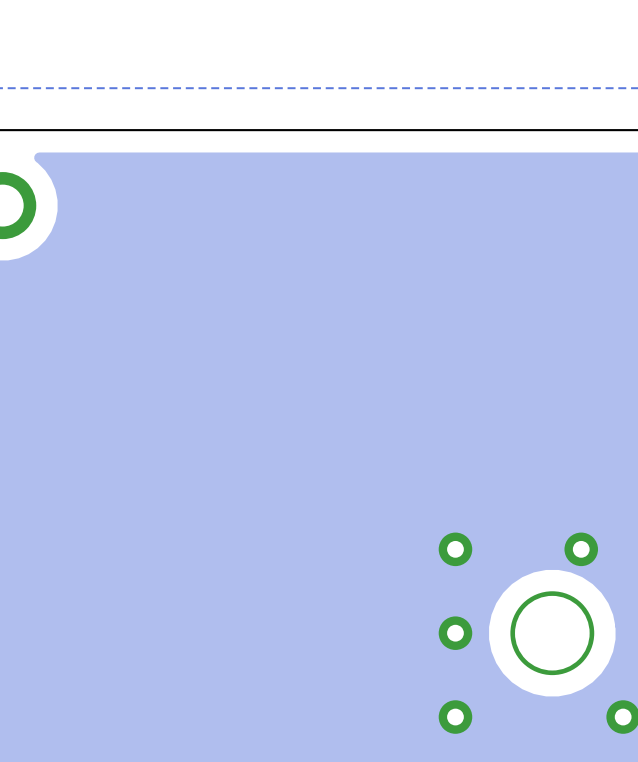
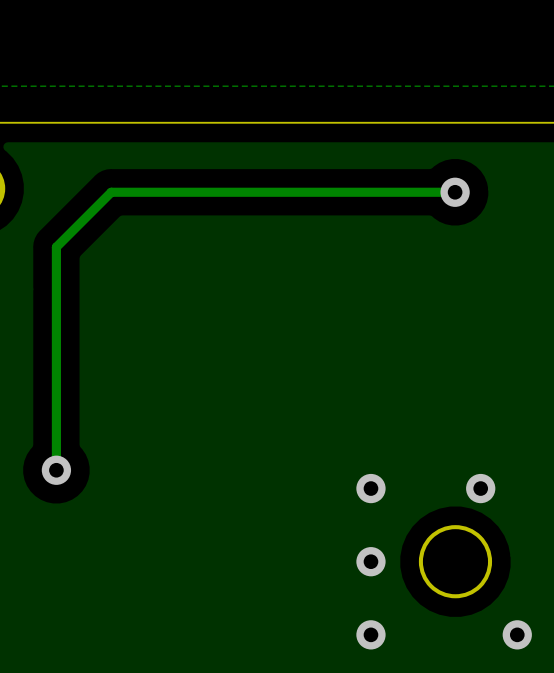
track: none -> (455, 192) (111, 192) (56, 247) (56, 470)
via: none -> (455, 192)
via: none -> (56, 470)

